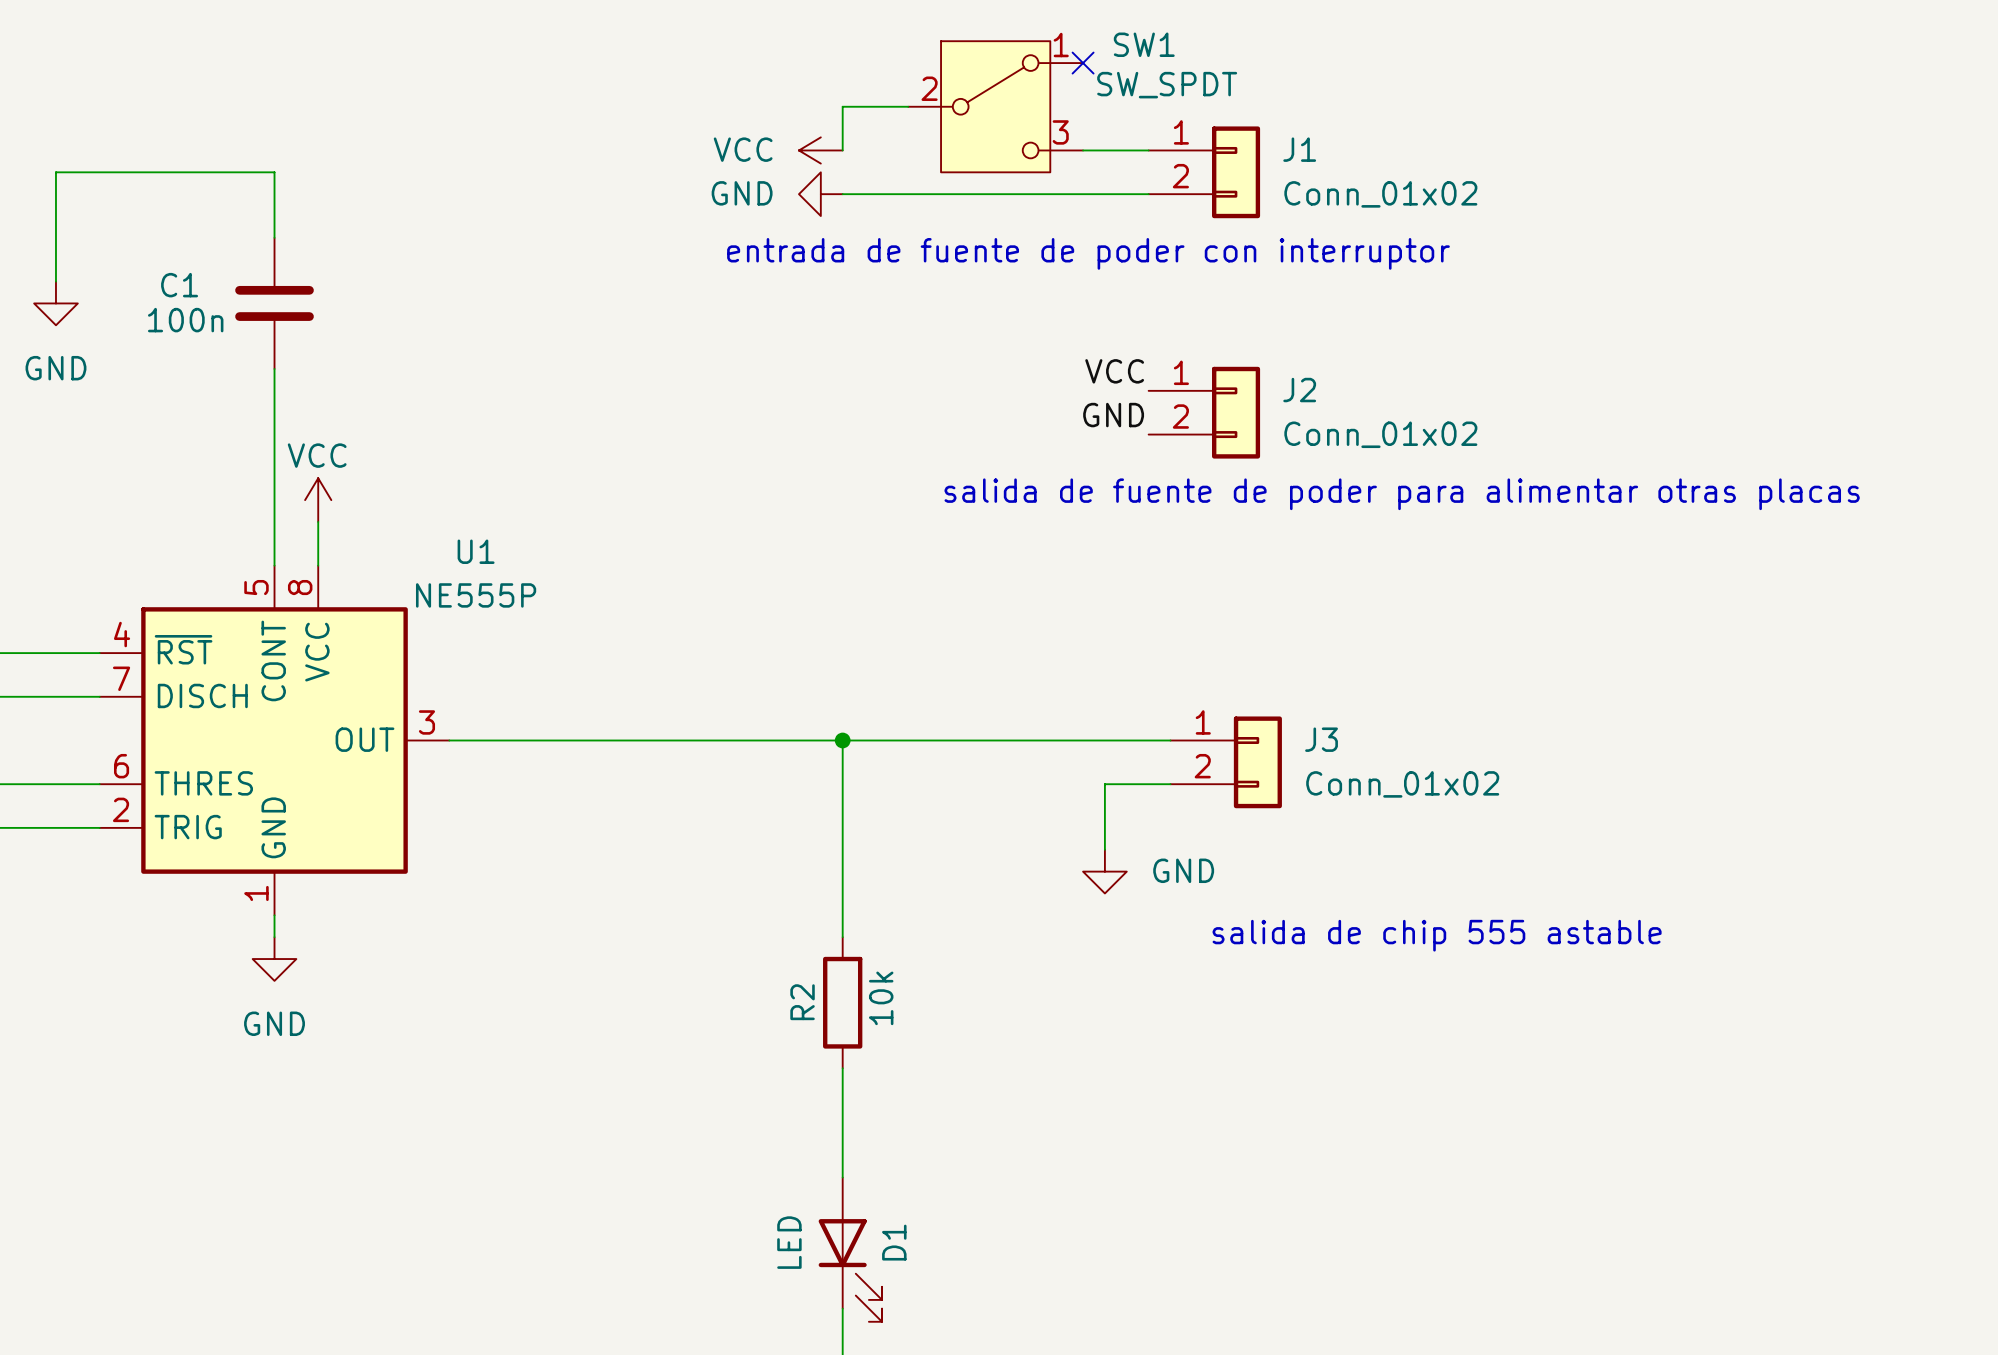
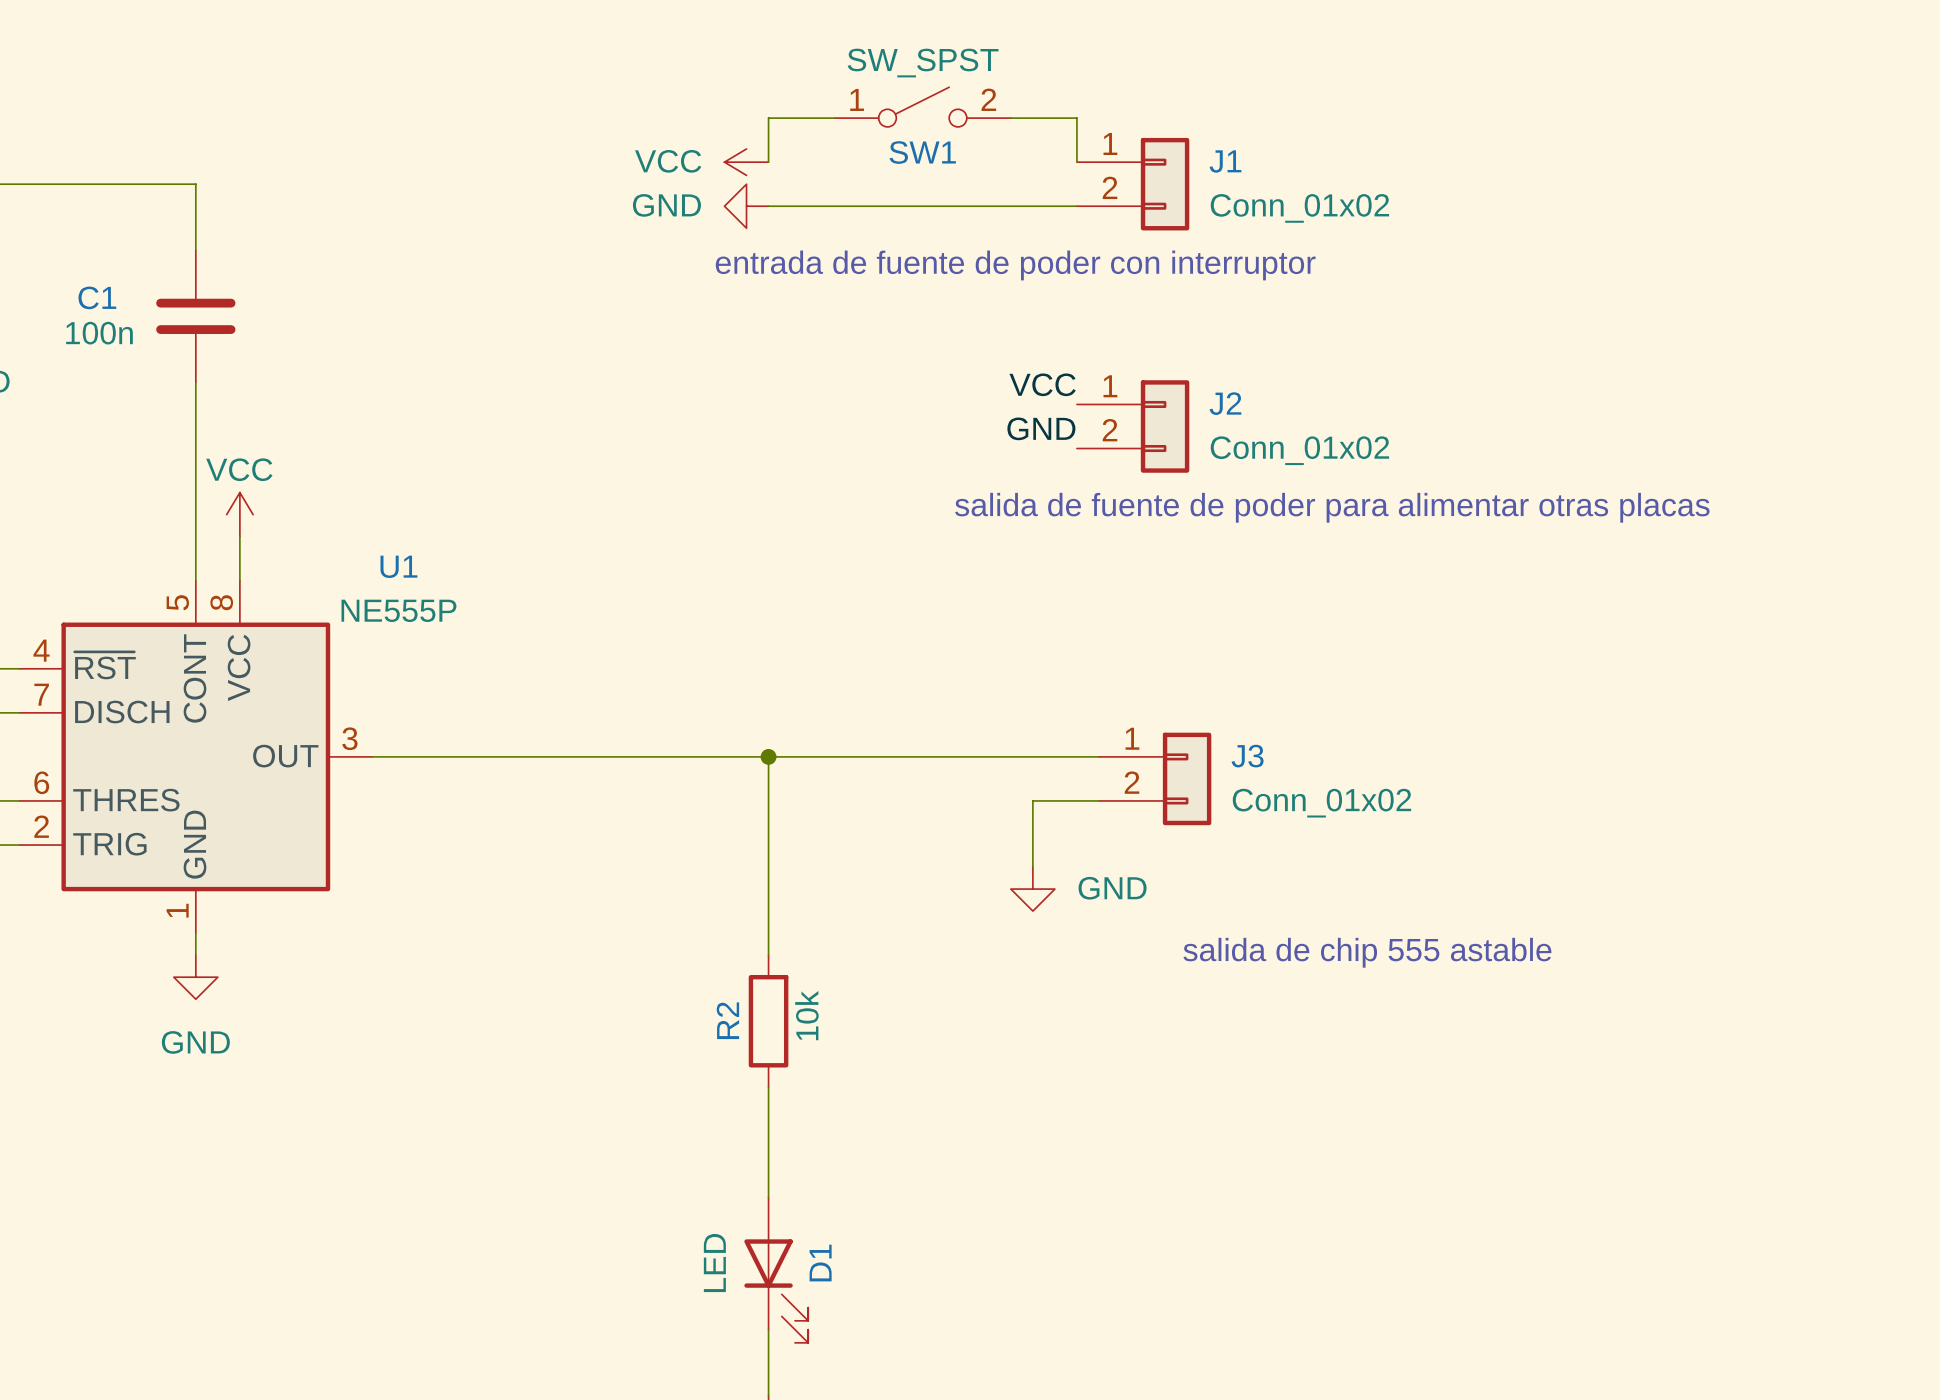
SW1 symbol: [908, 41, 1084, 173] -> [834, 87, 1011, 127]
SW1 name position: SW1 (1144, 44) -> SW1 (922, 152)
no-connect mark: (1083, 63) -> none
SW1 value: SW_SPDT (1167, 85) -> SW_SPST (923, 63)
wire: (1083, 150) (1148, 150) -> (1010, 118) (1076, 118) (1076, 162)

